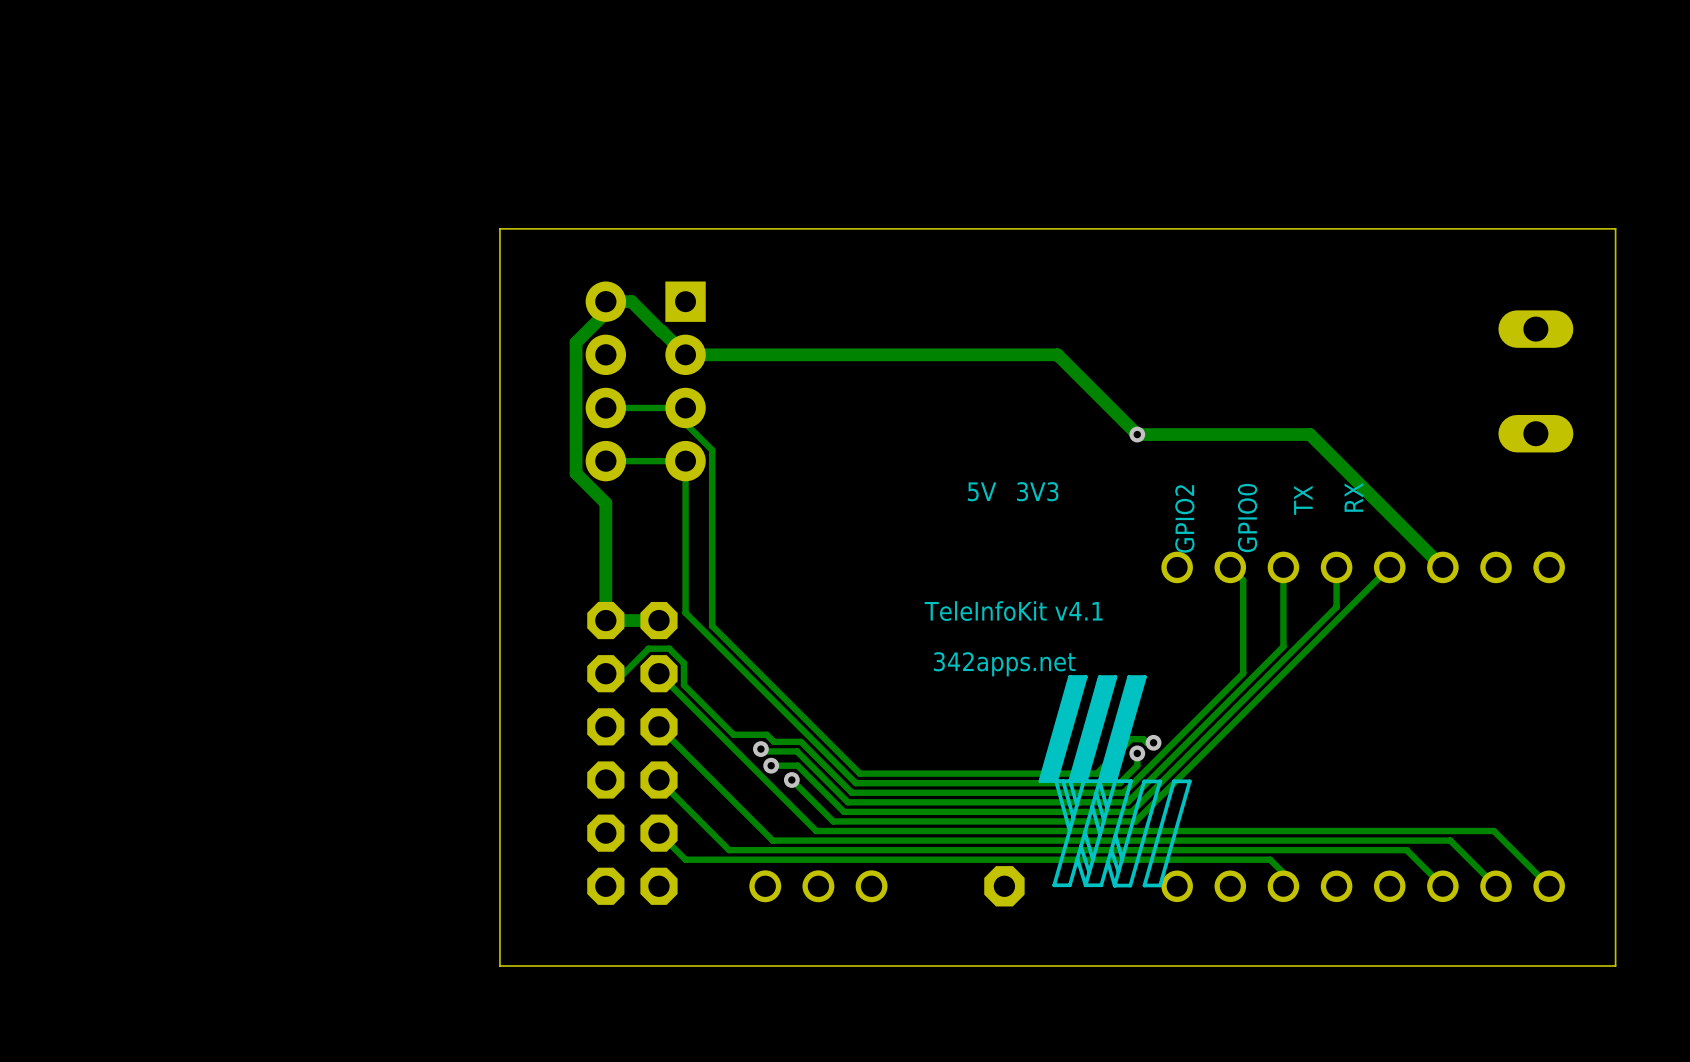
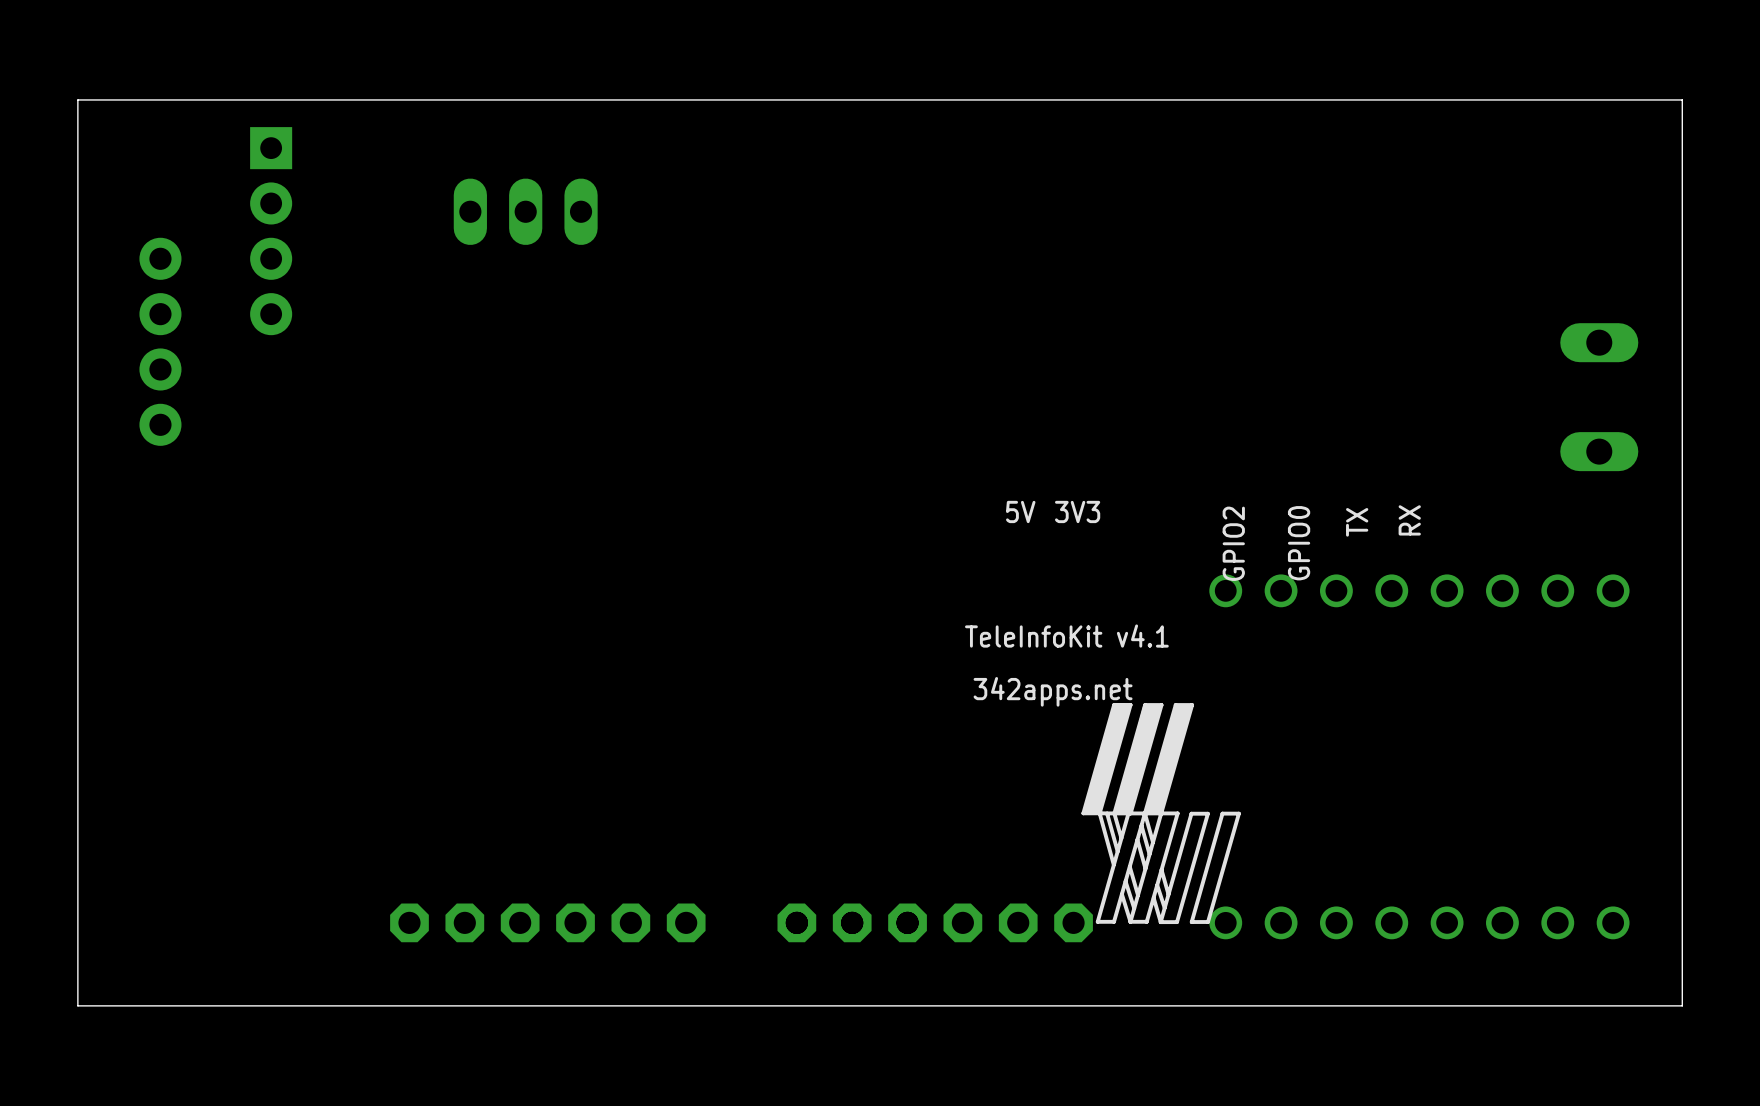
part: none -> (525, 211)
board edge: (1615, 228) (499, 228) (499, 966) -> (1682, 238) (1682, 99) (77, 99) (77, 1005) (520, 1005)
part position: (605, 381) -> (160, 341)
part position: (685, 381) -> (271, 231)
track: (605, 407) (685, 407) (685, 423) (712, 450) (712, 625) (859, 773) (1096, 773) (1131, 739) (1143, 739) (1146, 742) (1153, 742) -> none
via: (1137, 434) -> none
track: (605, 461) (685, 461) (685, 612) (855, 783) (1119, 783) (1137, 765) (1137, 753) -> none
track: (1230, 567) (1243, 580) (1243, 673) (1123, 792) (851, 792) (800, 741) (773, 741) (766, 734) (733, 734) (683, 685) (683, 663) (669, 648) (648, 648) (623, 673) (605, 673) -> none
track: (1283, 567) (1283, 646) (1127, 802) (847, 802) (797, 751) (763, 751) (760, 749) -> none
track: (1336, 567) (1336, 607) (1131, 811) (843, 811) (797, 765) (771, 765) -> none
track: (1389, 567) (1135, 821) (833, 821) (791, 779) -> none
track: (1442, 567) (1310, 434) (1137, 434) (1057, 354) (685, 354) (631, 301) (605, 301) (605, 312) (576, 342) (576, 473) (605, 503) (605, 620) (658, 620) -> none
track: (658, 673) (816, 831) (1493, 831) (1549, 886) -> none
track: (658, 726) (772, 840) (1450, 840) (1496, 886) -> none
via: (1153, 742) -> none
via: (760, 749) -> none
part: (605, 753) -> none
part: (658, 753) -> none
via: (1137, 753) -> none
via: (771, 765) -> none
track: (658, 779) (729, 850) (1406, 850) (1442, 886) -> none
via: (791, 779) -> none
track: (658, 833) (685, 859) (1270, 859) (1283, 873) (1283, 886) -> none
part: none -> (547, 922)
part: none -> (935, 922)
part: (1004, 886) -> none

